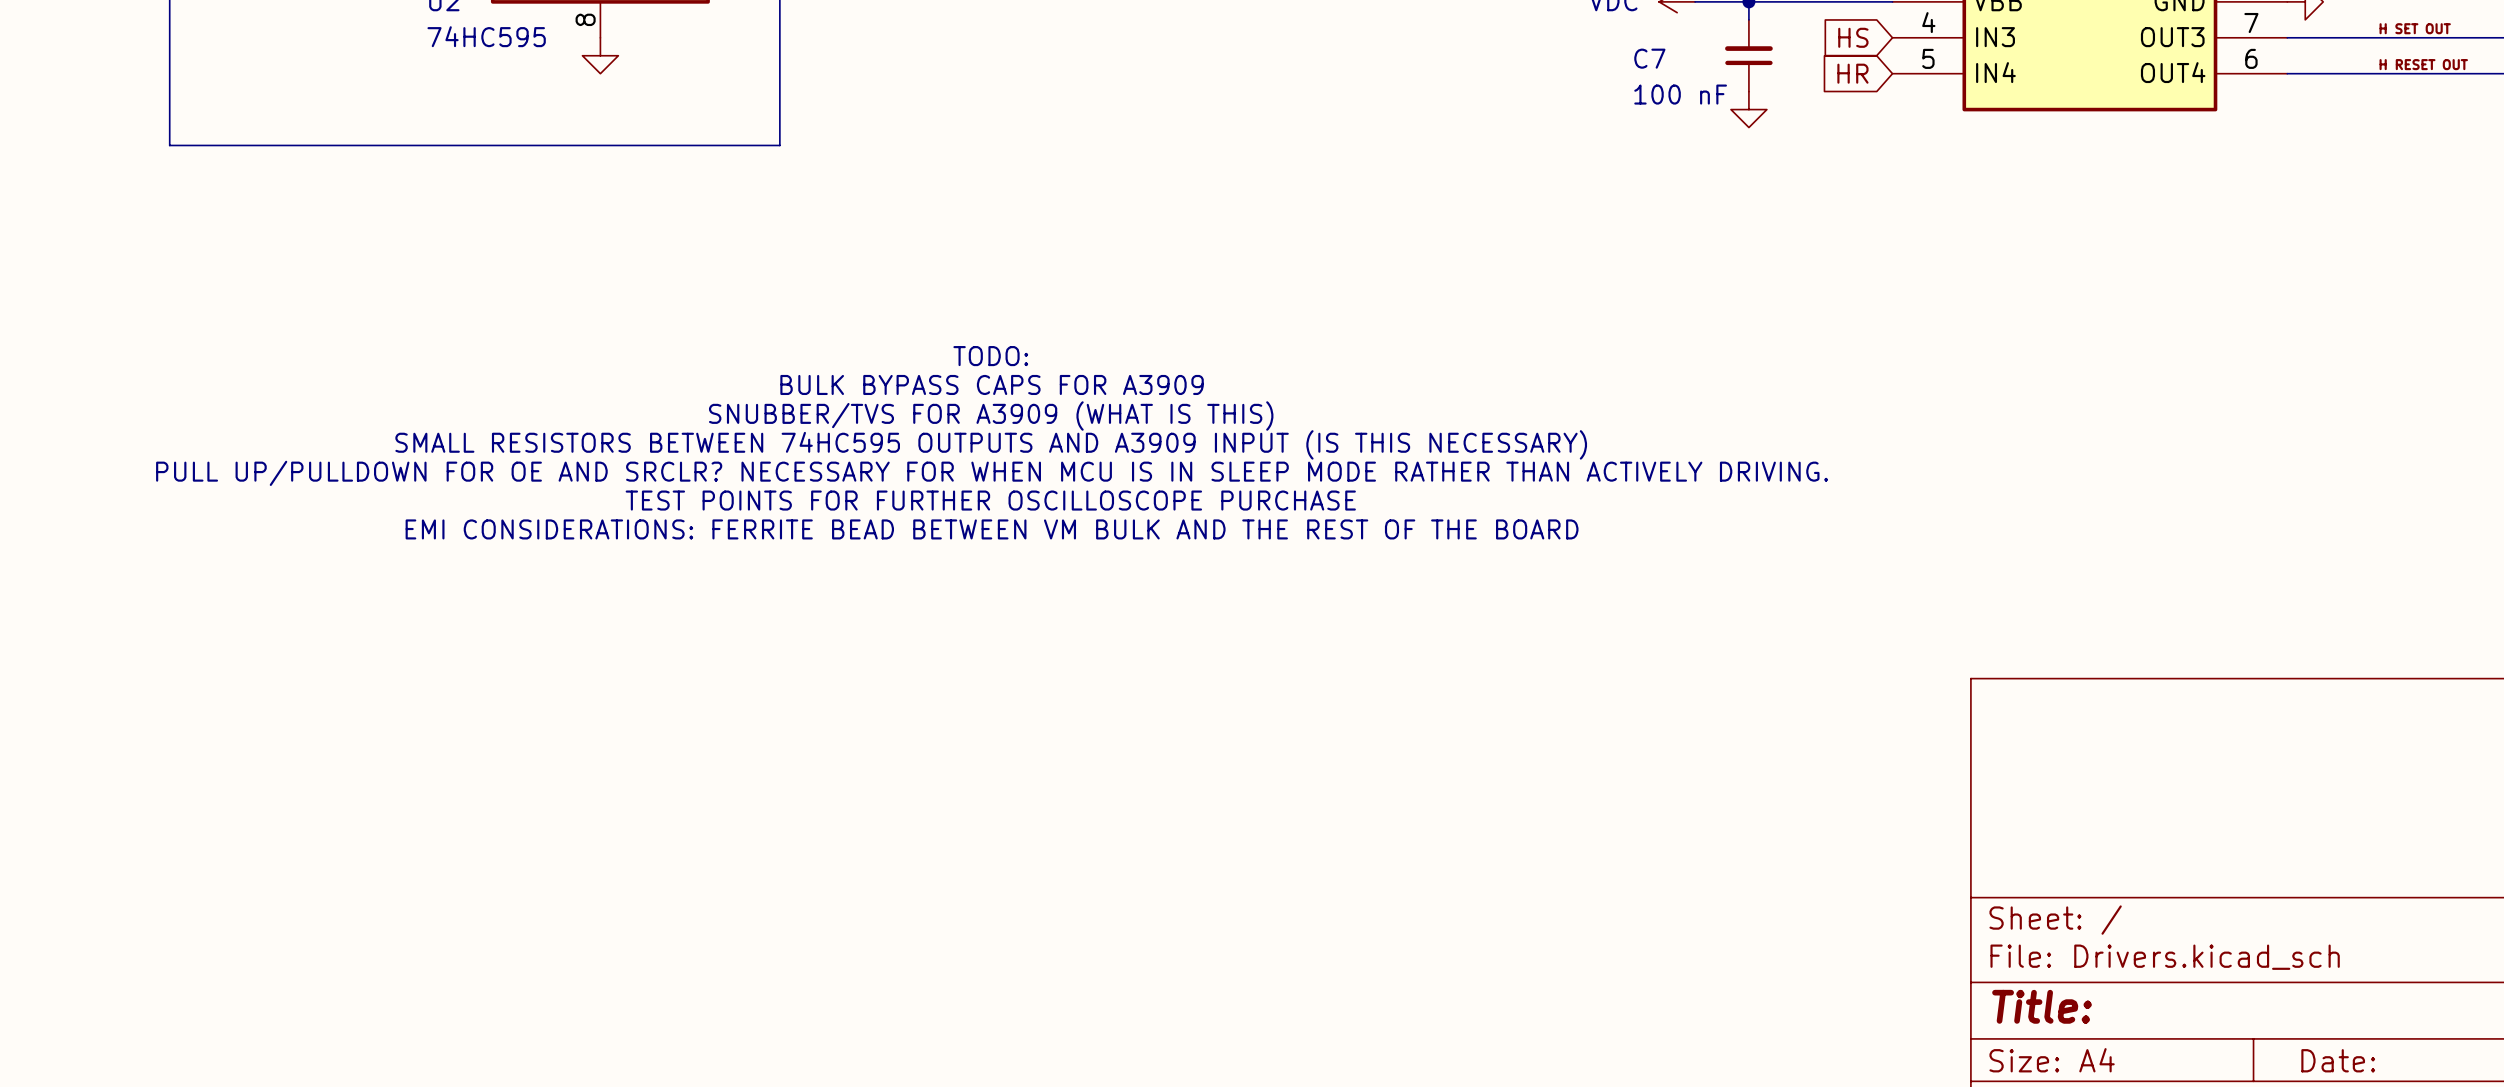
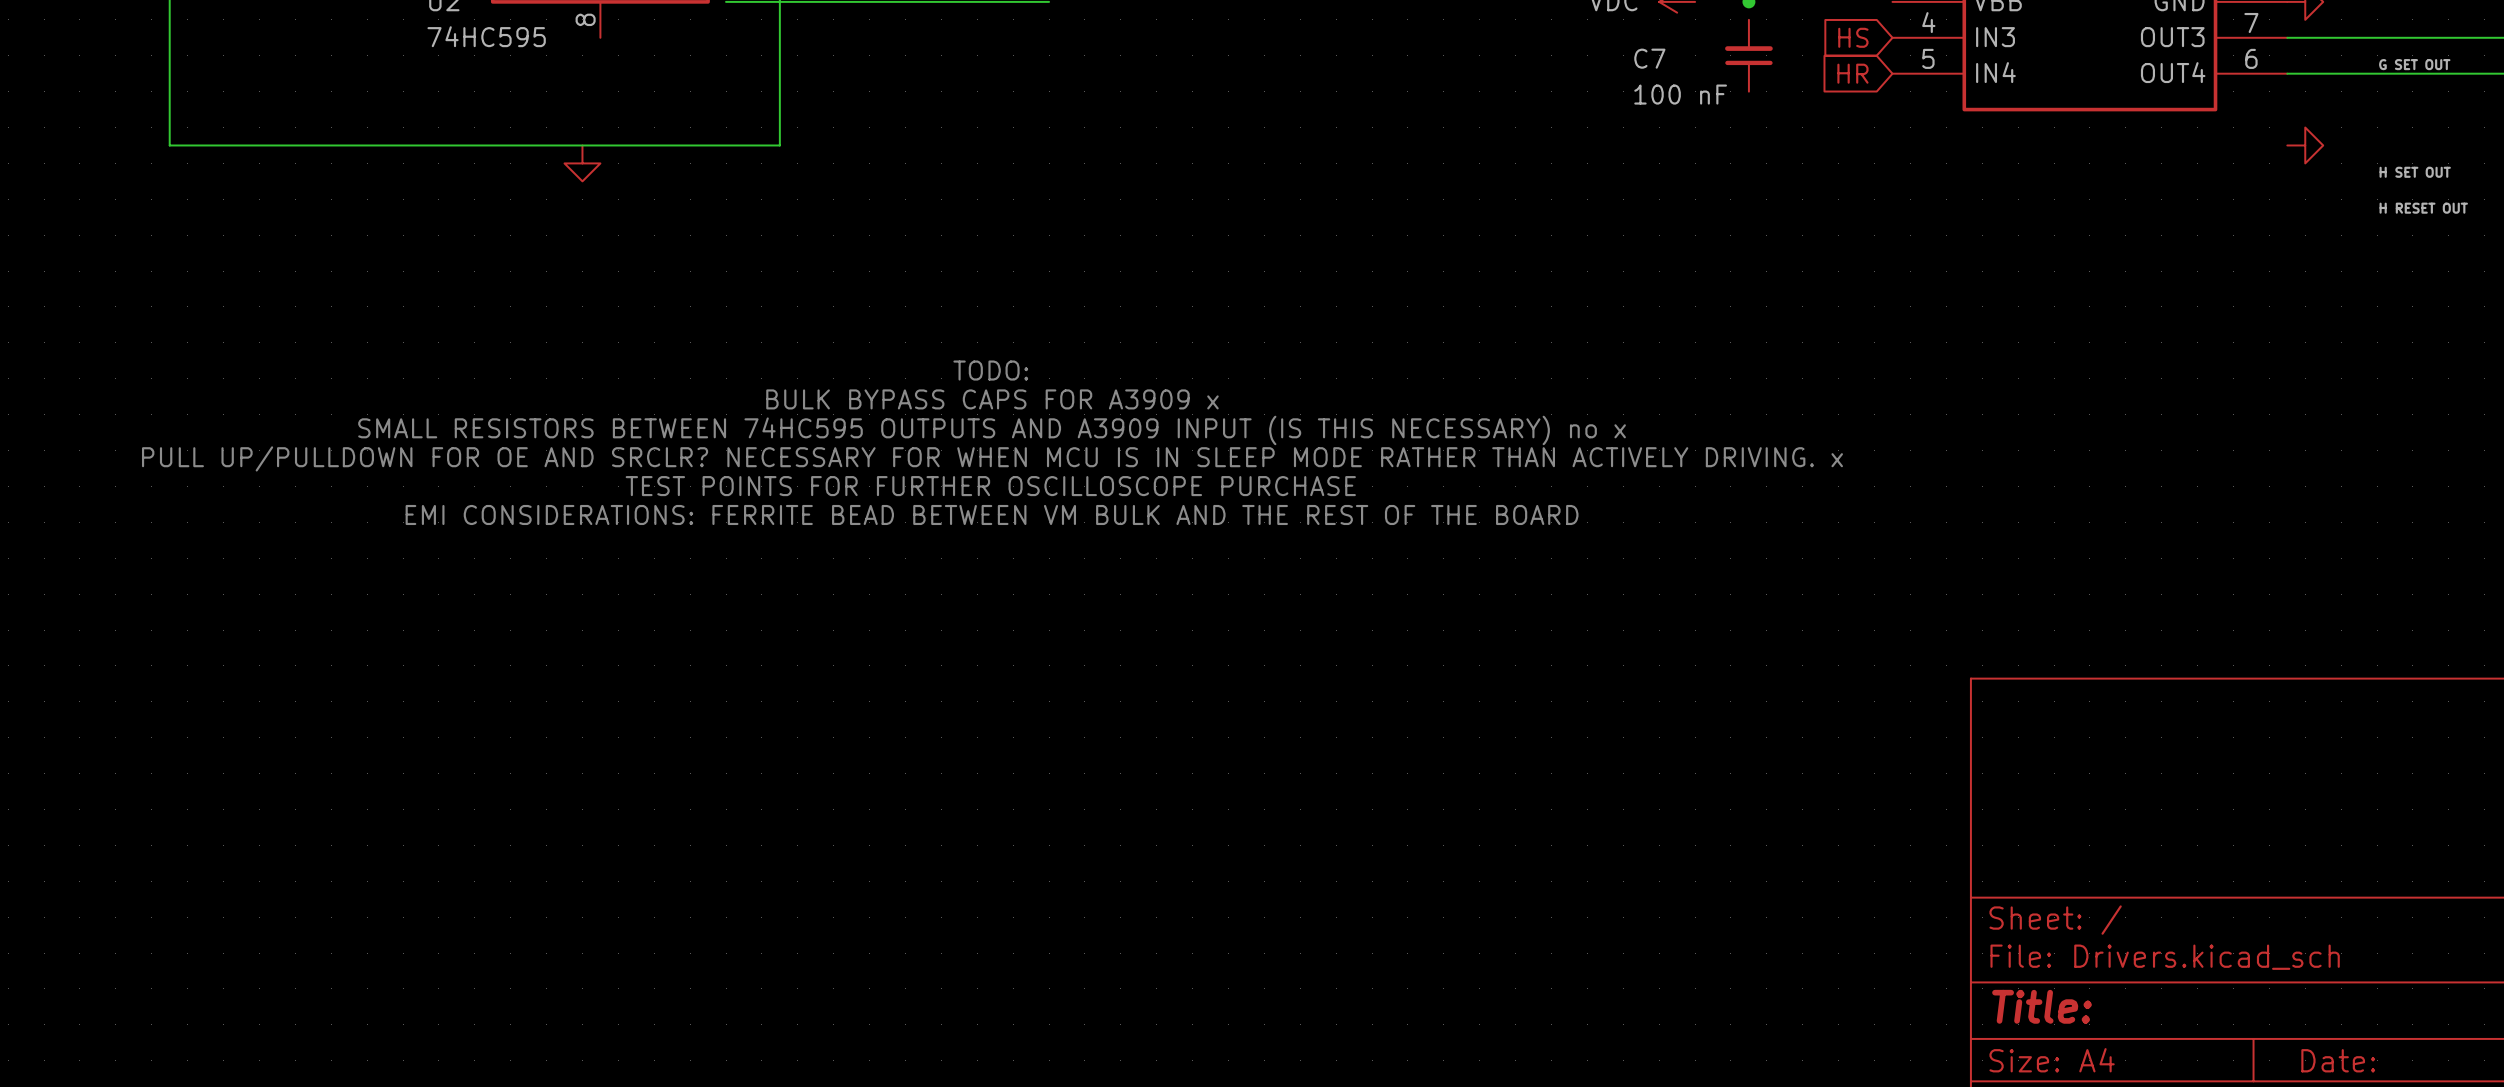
wire: none -> (726, 1) (1049, 1)
wire: (1695, 1) (1892, 1) -> none
wire: (1748, 1) (1748, 19) -> none
label position: H SET OUT (2415, 28) -> H SET OUT (2415, 172)
power symbol position: (600, 55) -> (582, 163)
label: H RESET OUT (2423, 64) -> G SET OUT (2414, 64)
power symbol: (1748, 109) -> none
power symbol: none -> (2305, 145)
label: none -> H RESET OUT (2423, 208)
text position: TODO: (990, 356) -> TODO: (990, 370)
text: BULK BYPASS CAPS FOR A3909 (992, 384) -> BULK BYPASS CAPS FOR A3909 x (992, 399)
text: SNUBBER/TVS FOR A3909 (WHAT IS THIS) (991, 416) -> none
text: SMALL RESISTORS BETWEEN 74HC595 OUTPUTS AND A3909 INPUT (IS THIS NECESSARY) (991, 444) -> SMALL RESISTORS BETWEEN 74HC595 OUTPUTS AND A3909 INPUT (IS THIS NECESSARY) no x (992, 430)
text: PULL UP/PULLDOWN FOR OE AND SRCLR? NECESSARY FOR WHEN MCU IS IN SLEEP MODE RATHER THAN ACTIVELY DRIVING. (992, 473) -> PULL UP/PULLDOWN FOR OE AND SRCLR? NECESSARY FOR WHEN MCU IS IN SLEEP MODE RATHER THAN ACTIVELY DRIVING. x (992, 458)
text position: TEST POINTS FOR FURTHER OSCILLOSCOPE PURCHASE (990, 500) -> TEST POINTS FOR FURTHER OSCILLOSCOPE PURCHASE (990, 486)
text position: EMI CONSIDERATIONS: FERRITE BEAD BETWEEN VM BULK AND THE REST OF THE BOARD (992, 529) -> EMI CONSIDERATIONS: FERRITE BEAD BETWEEN VM BULK AND THE REST OF THE BOARD (992, 514)

